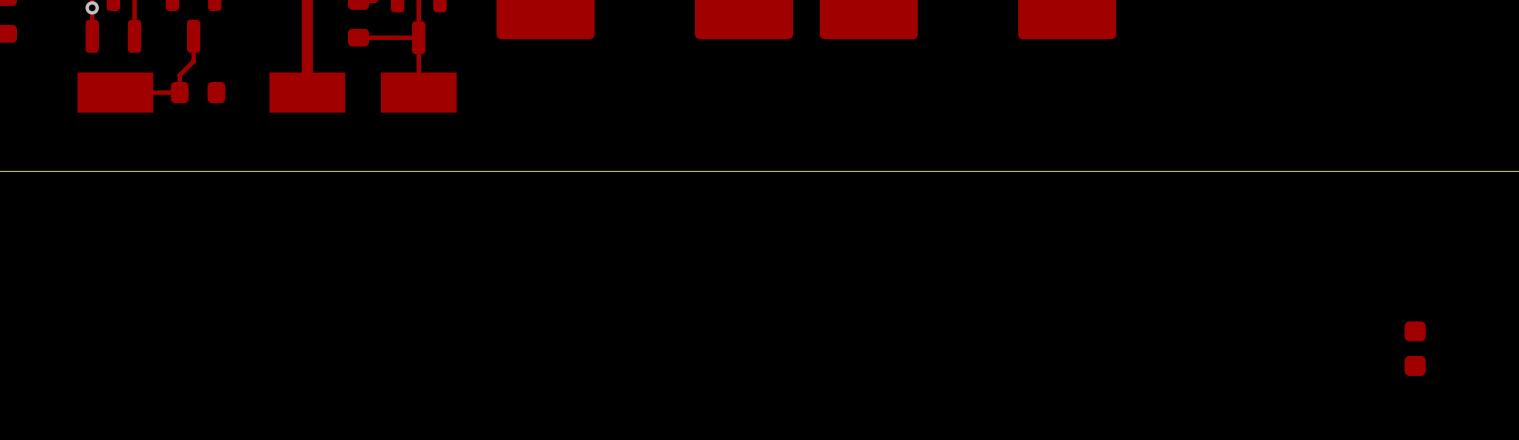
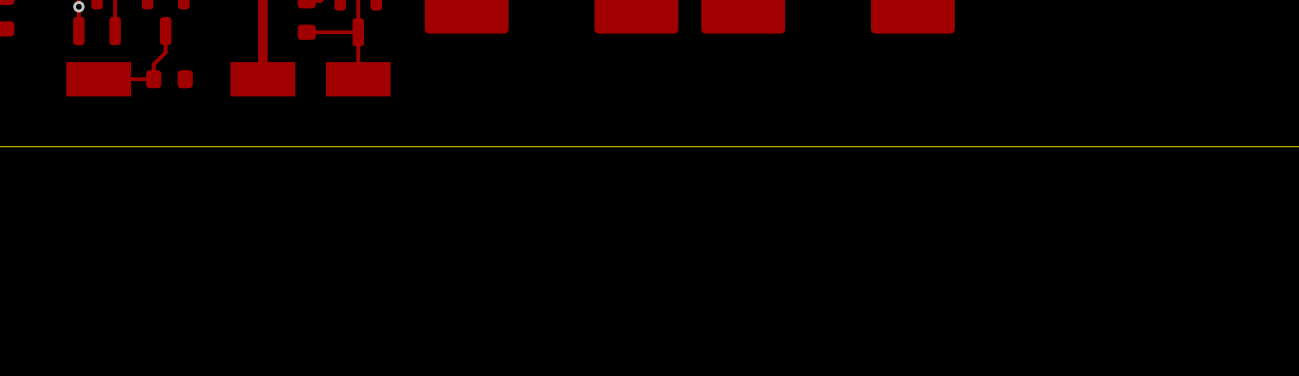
part: (1415, 348) -> none

